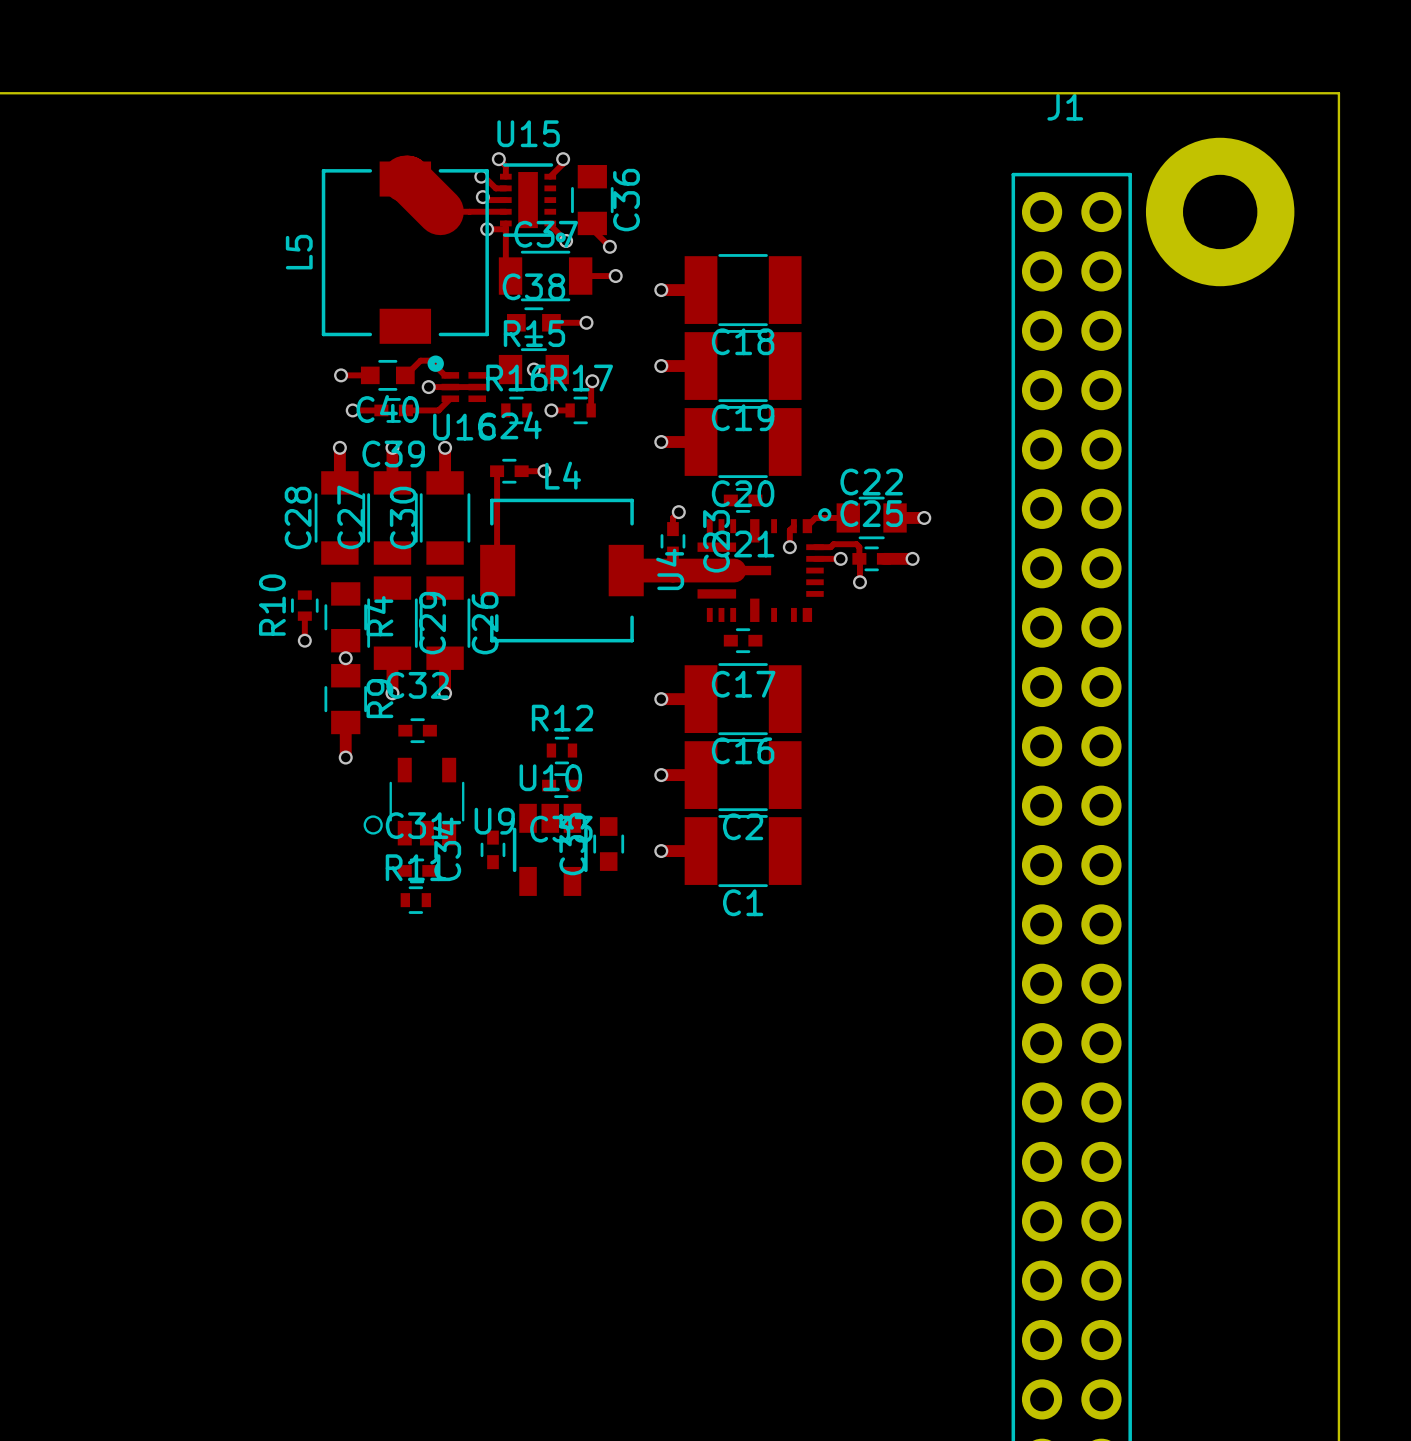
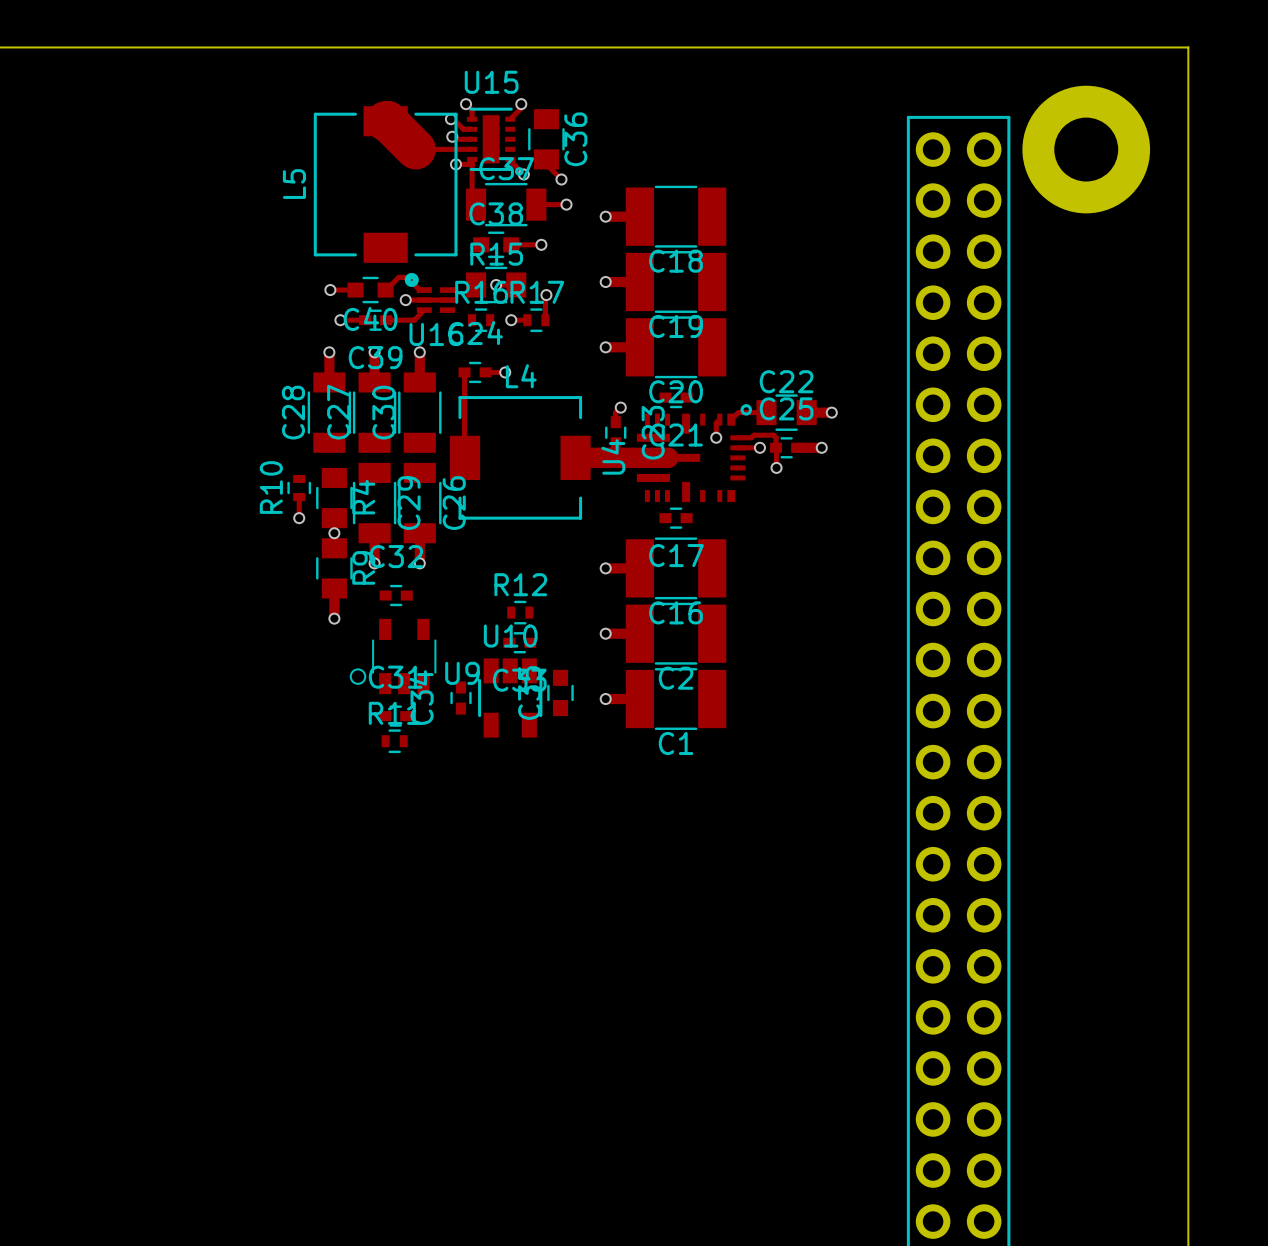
J1 name: J1 (1065, 107) -> none

